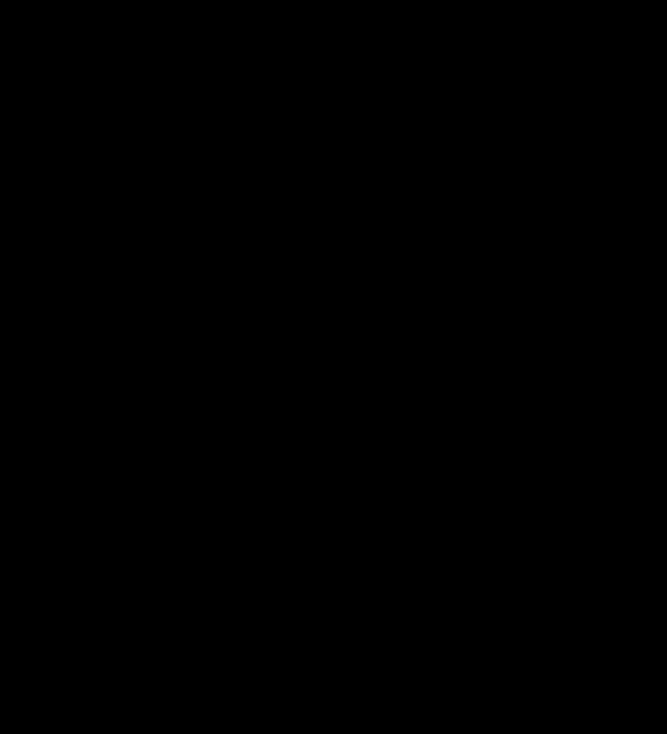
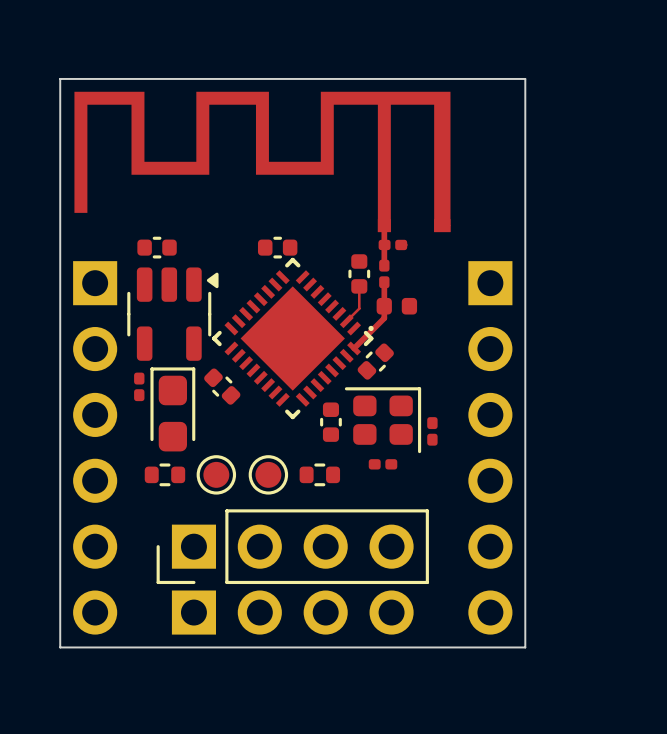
board edge: none -> (60, 78) (525, 78) (525, 647) (60, 647) (60, 78)
part: none -> (262, 161)
track: none -> (384, 225) (384, 265)
part: none -> (392, 244)
part: none -> (157, 247)
part: none -> (277, 247)
part: none -> (359, 273)
part: none -> (384, 273)
track: none -> (384, 282) (384, 318) (354, 348)
track: none -> (359, 286) (359, 308) (346, 321)
part: none -> (396, 306)
part: none -> (172, 314)
part: none -> (292, 338)
part: none -> (375, 361)
part: none -> (139, 386)
part: none -> (222, 386)
part: none -> (172, 409)
part: none -> (383, 420)
part: none -> (330, 422)
part: none -> (432, 431)
part: none -> (95, 447)
part: none -> (490, 447)
part: none -> (383, 464)
part: none -> (164, 474)
part: none -> (216, 474)
part: none -> (268, 474)
part: none -> (319, 474)
part: none -> (292, 546)
part: none -> (292, 612)

